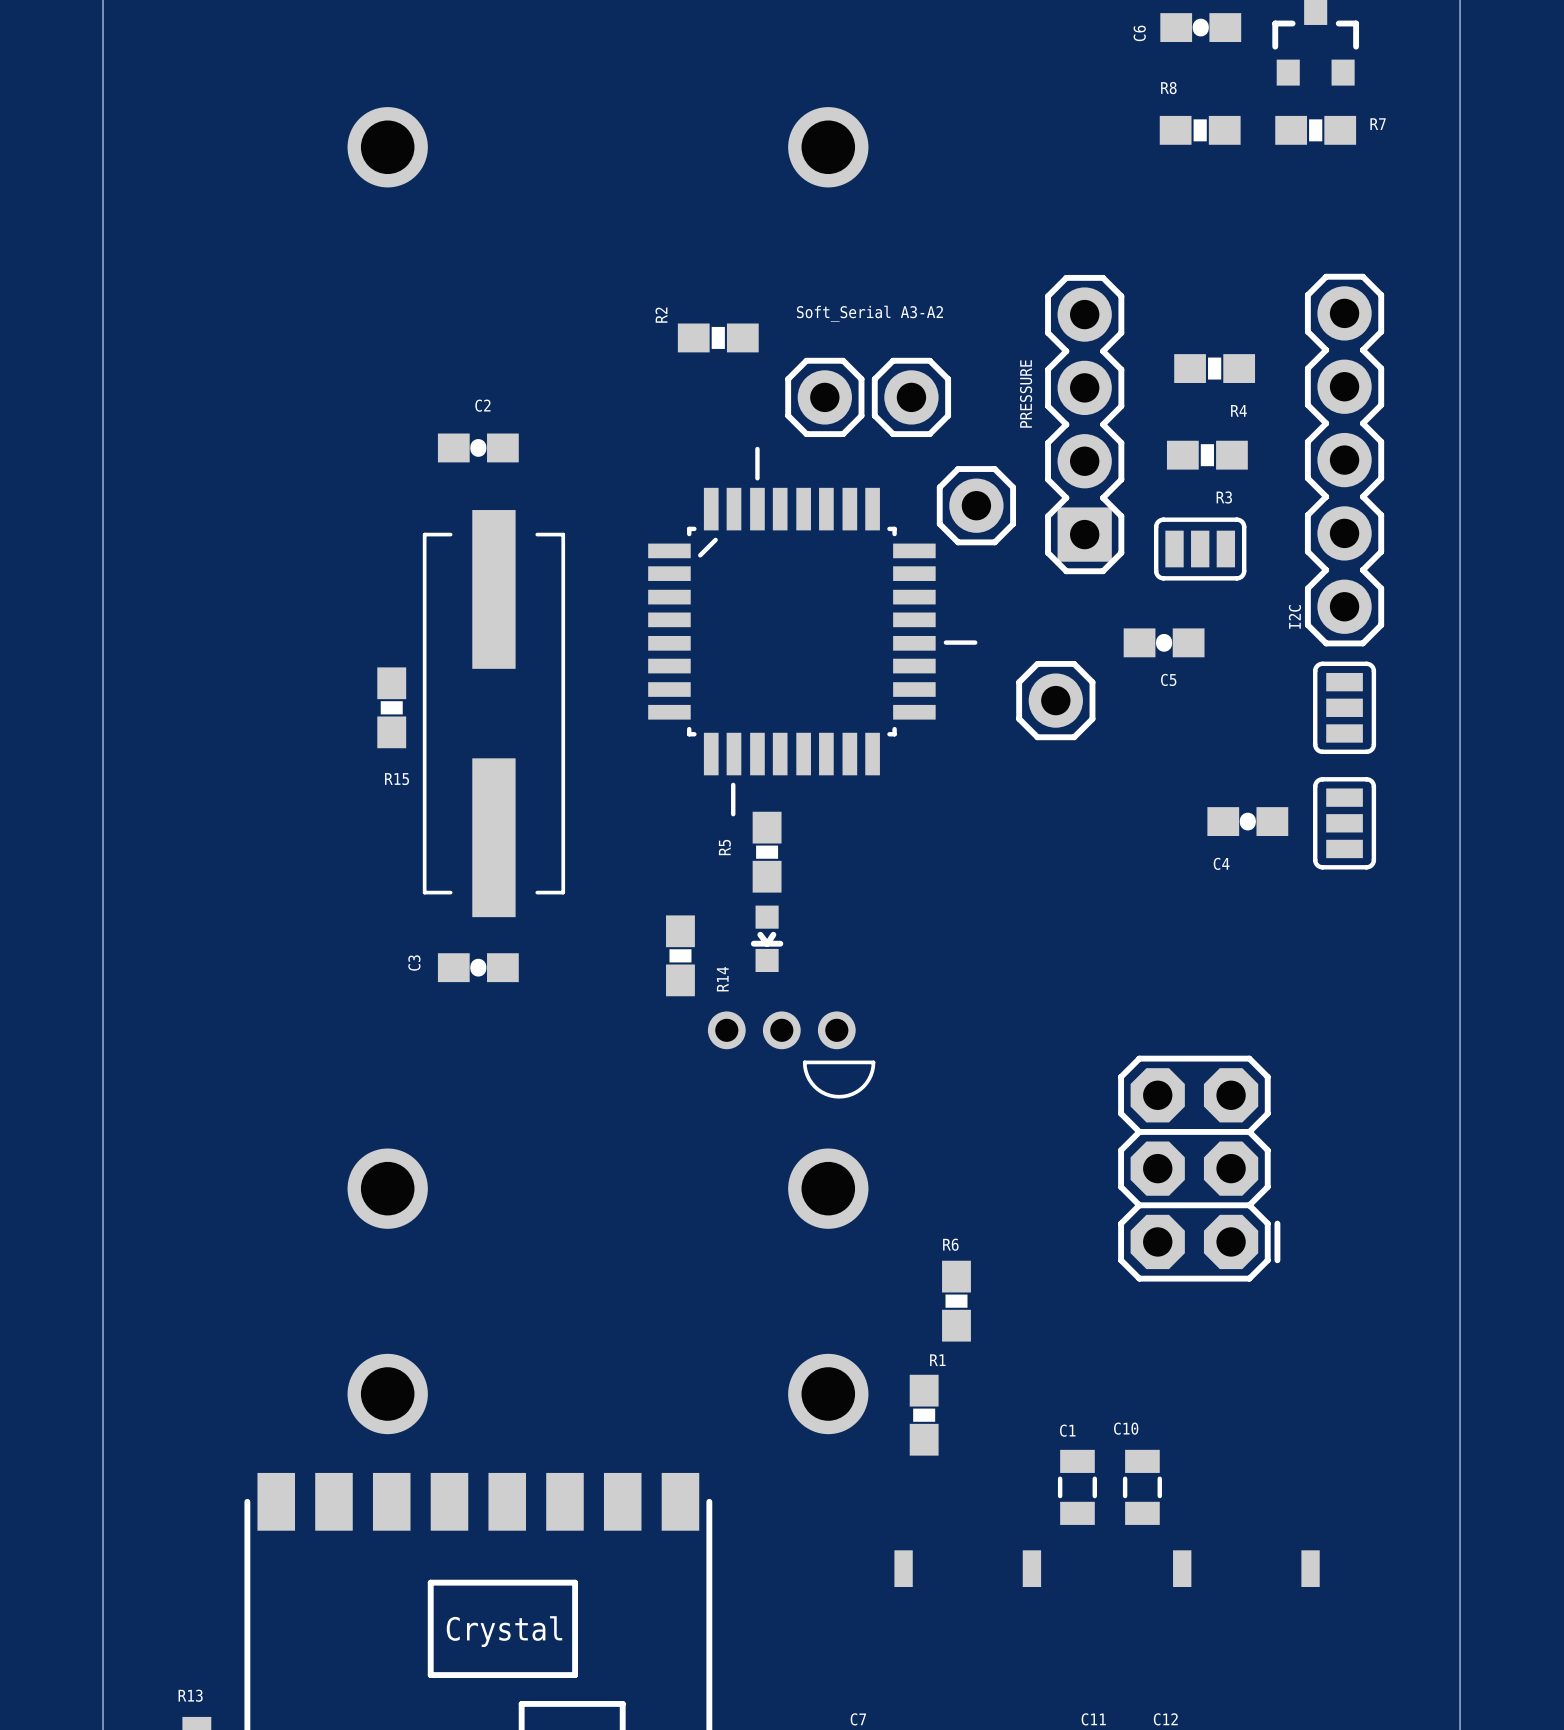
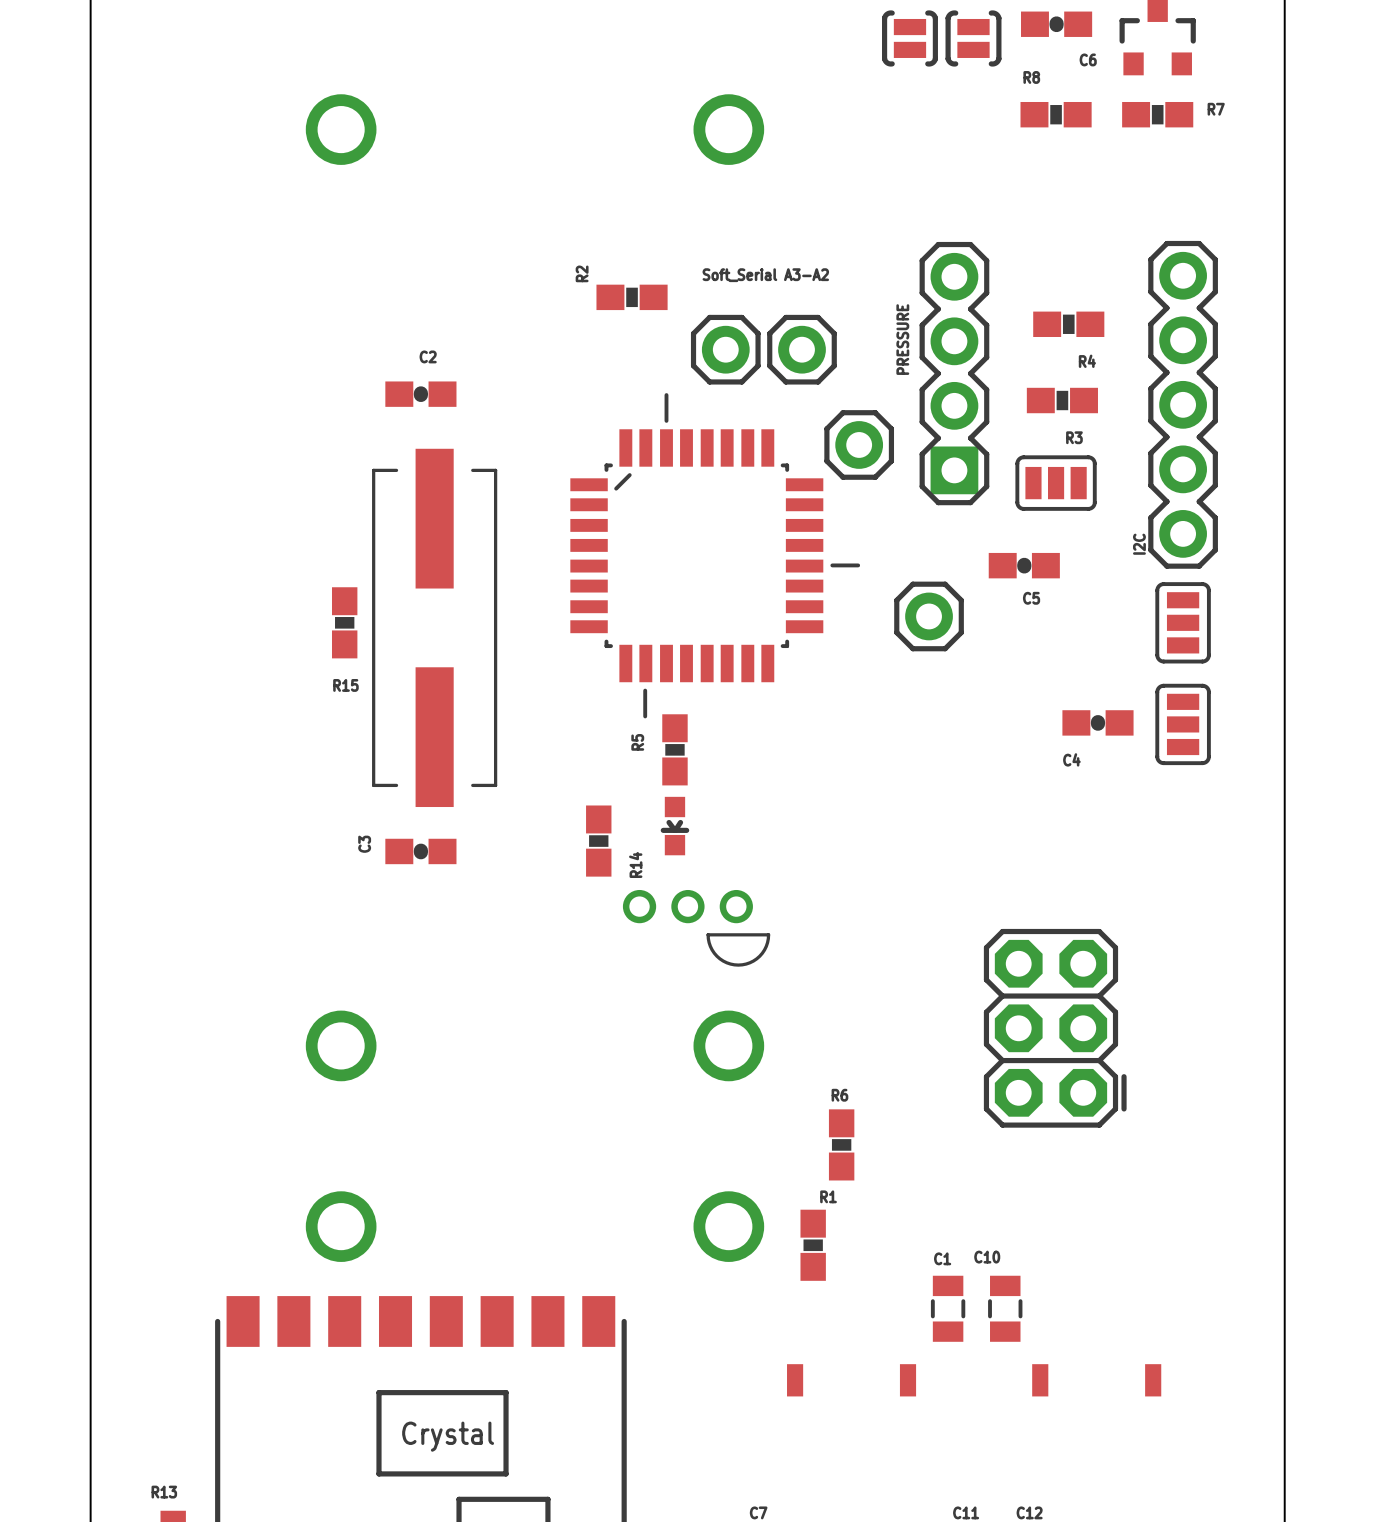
C6 name rotation: 0° (1139, 33) -> 90° clockwise (1088, 59)
C6 name position: C6 (1139, 33) -> C6 (1088, 59)
part: none -> (909, 38)
part: none -> (973, 38)

